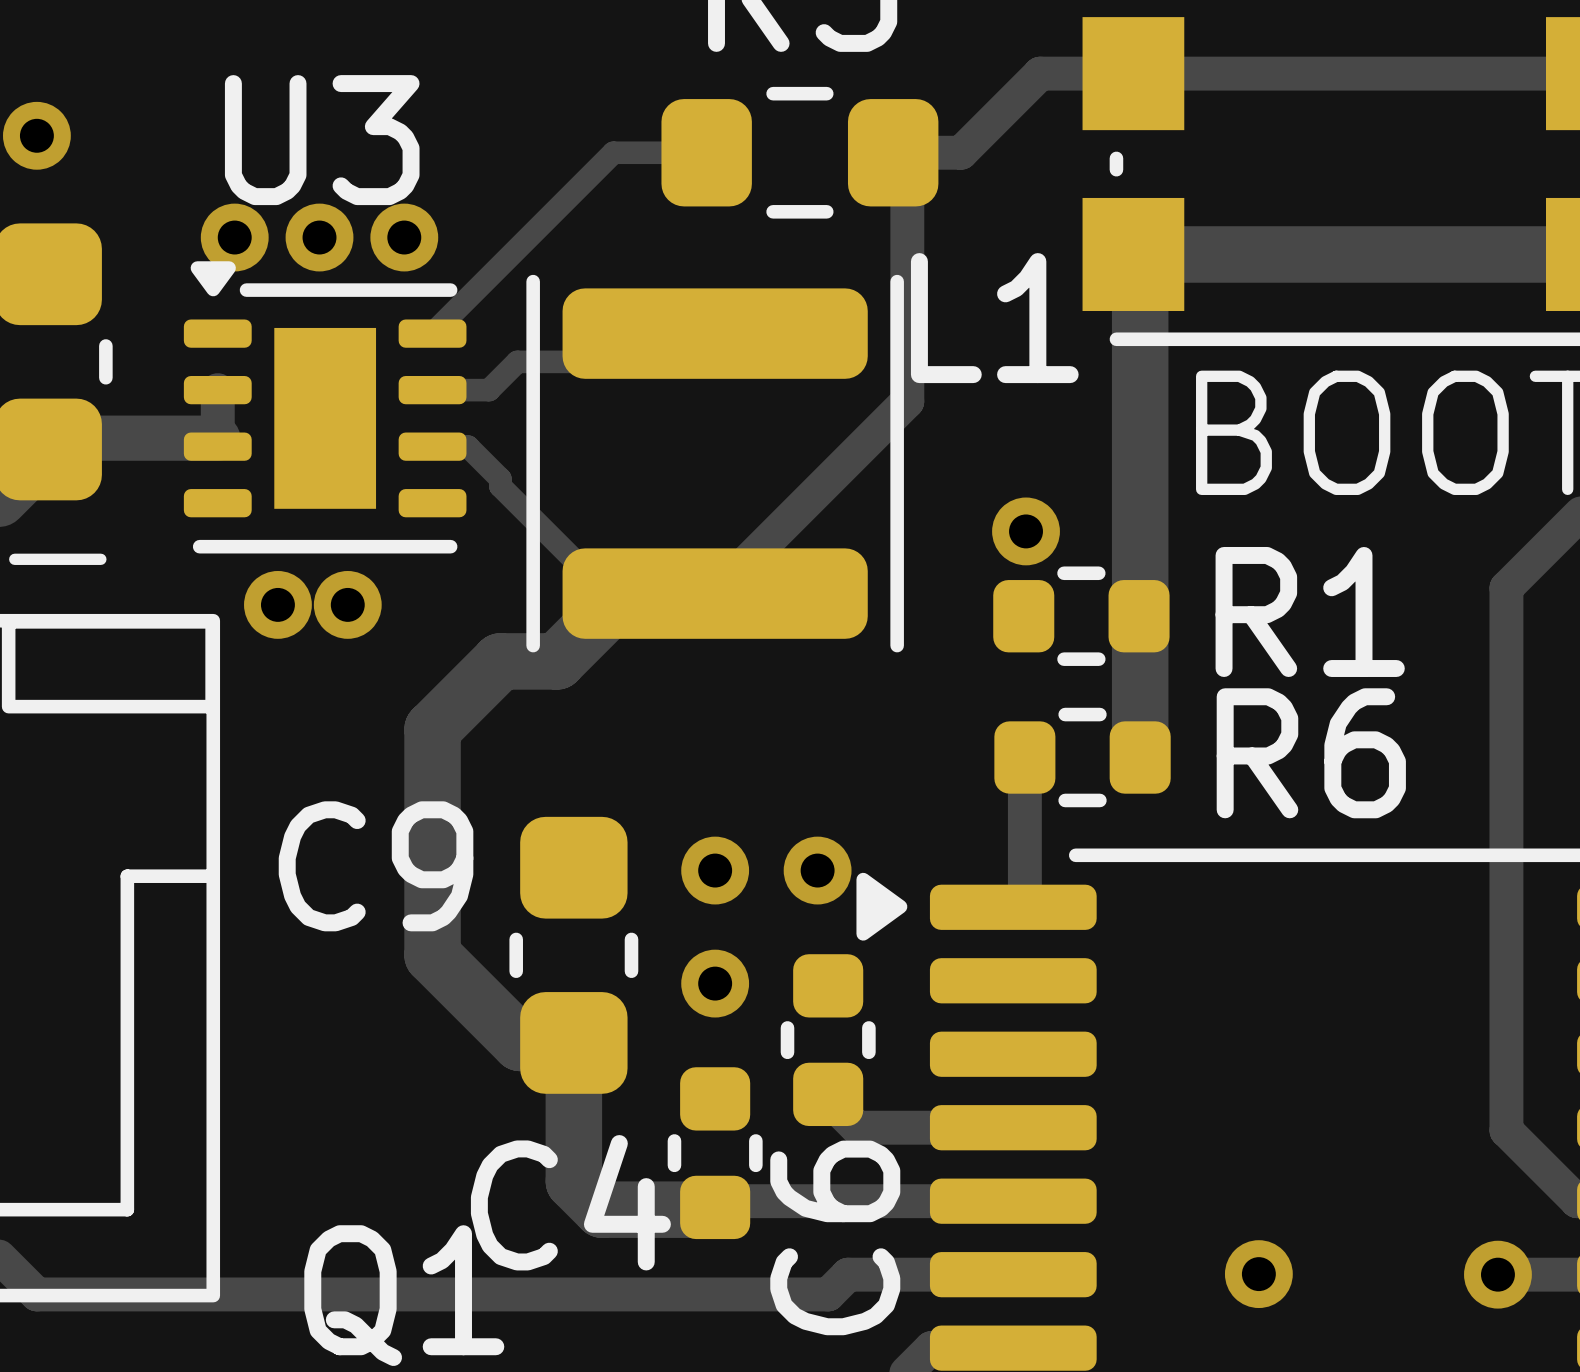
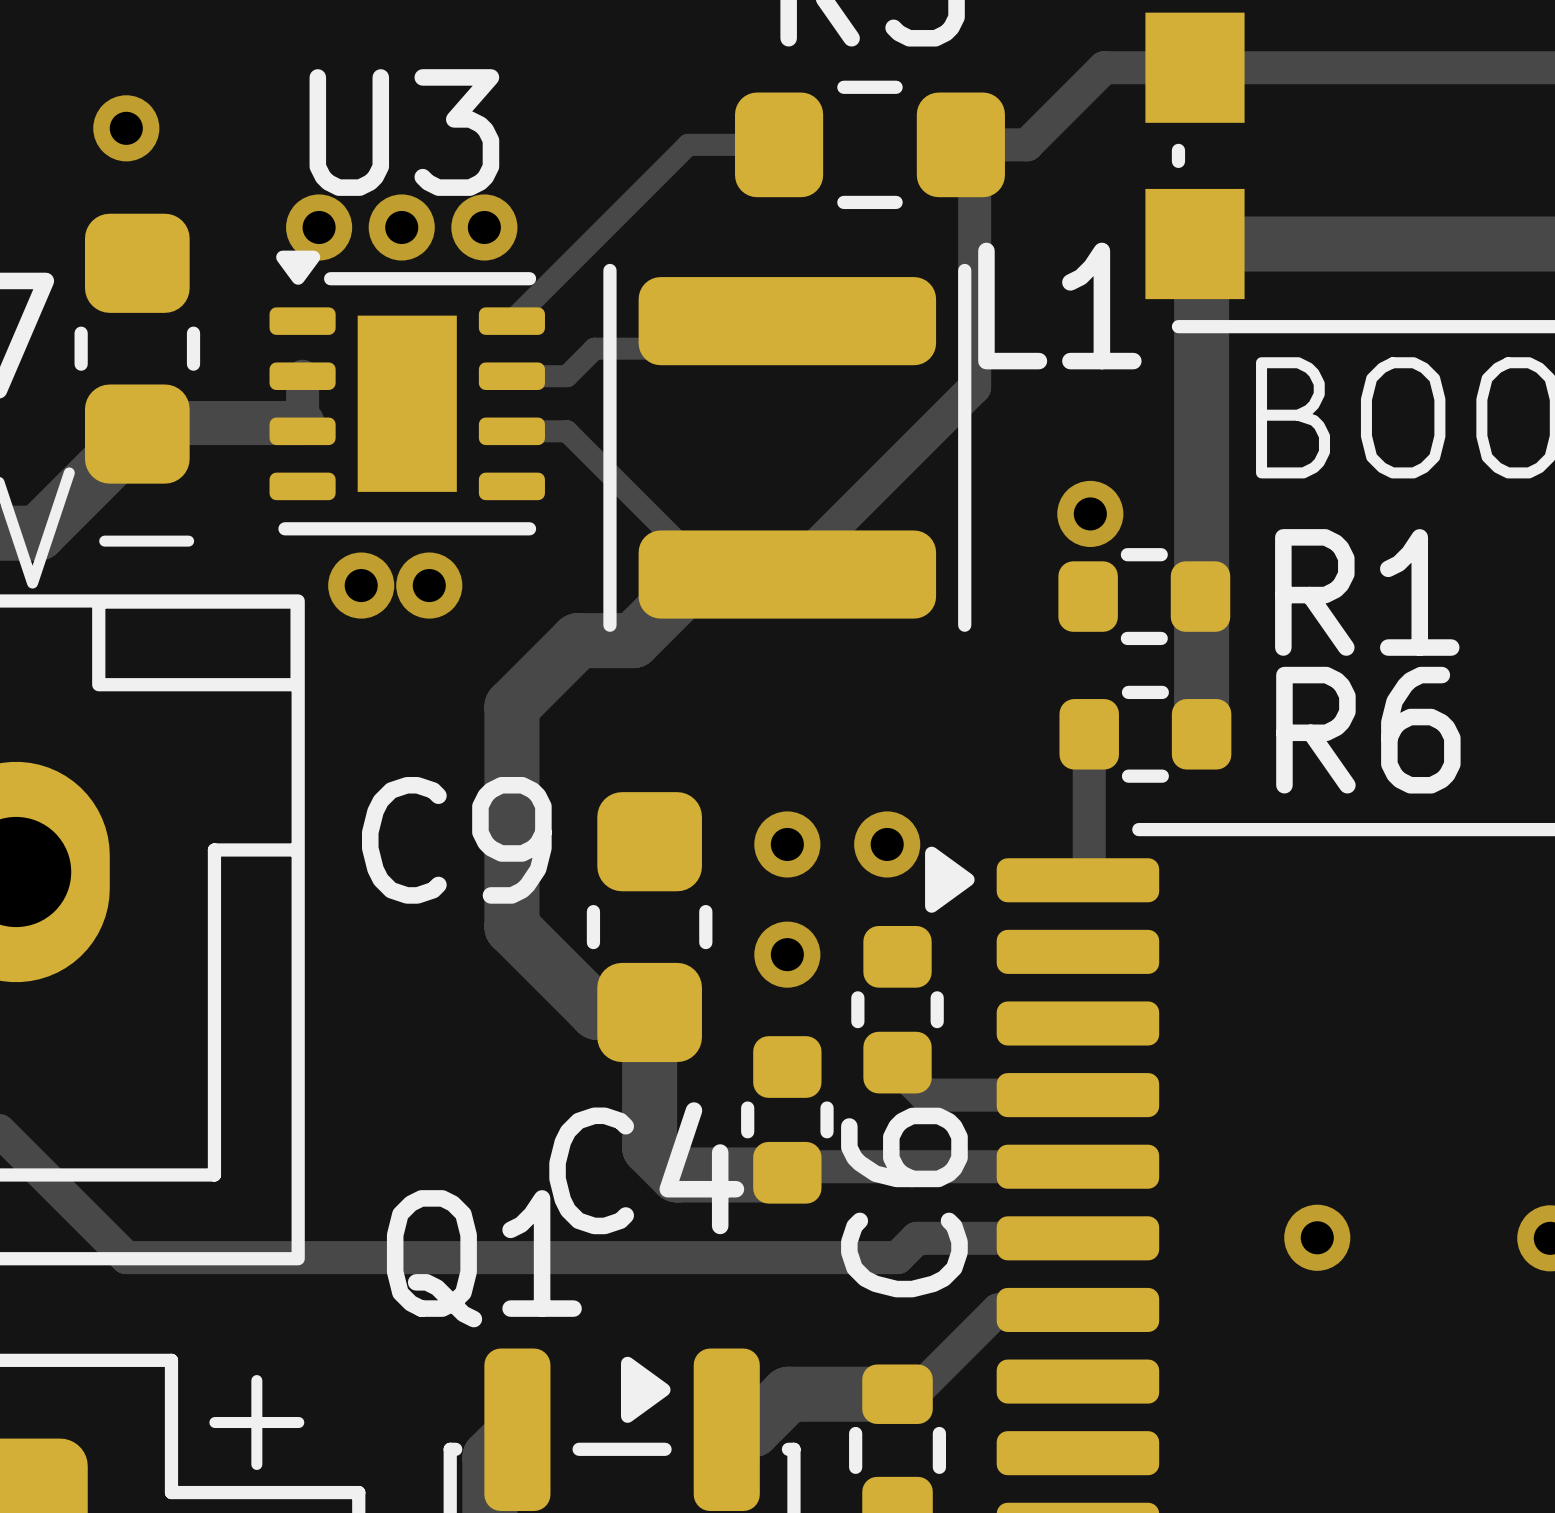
track: (468, 446) (500, 478) (500, 486) (607, 593) (636, 593) -> (546, 431) (567, 431) (710, 574)

